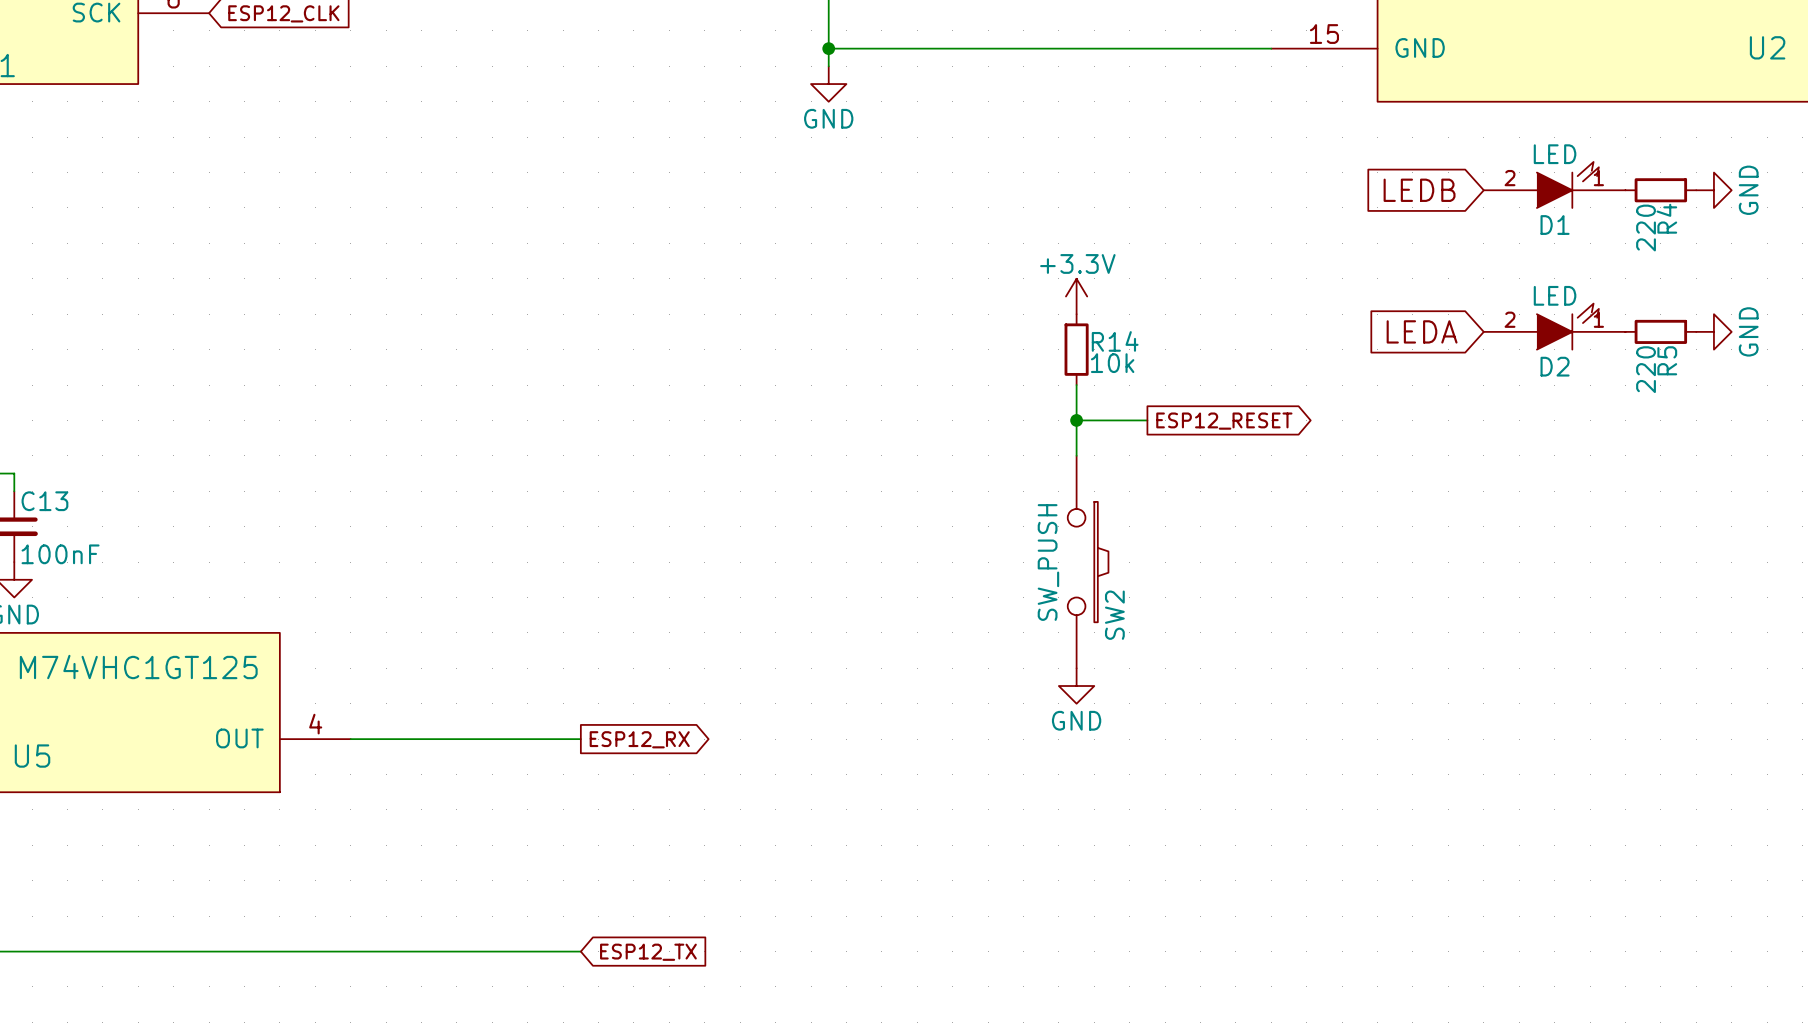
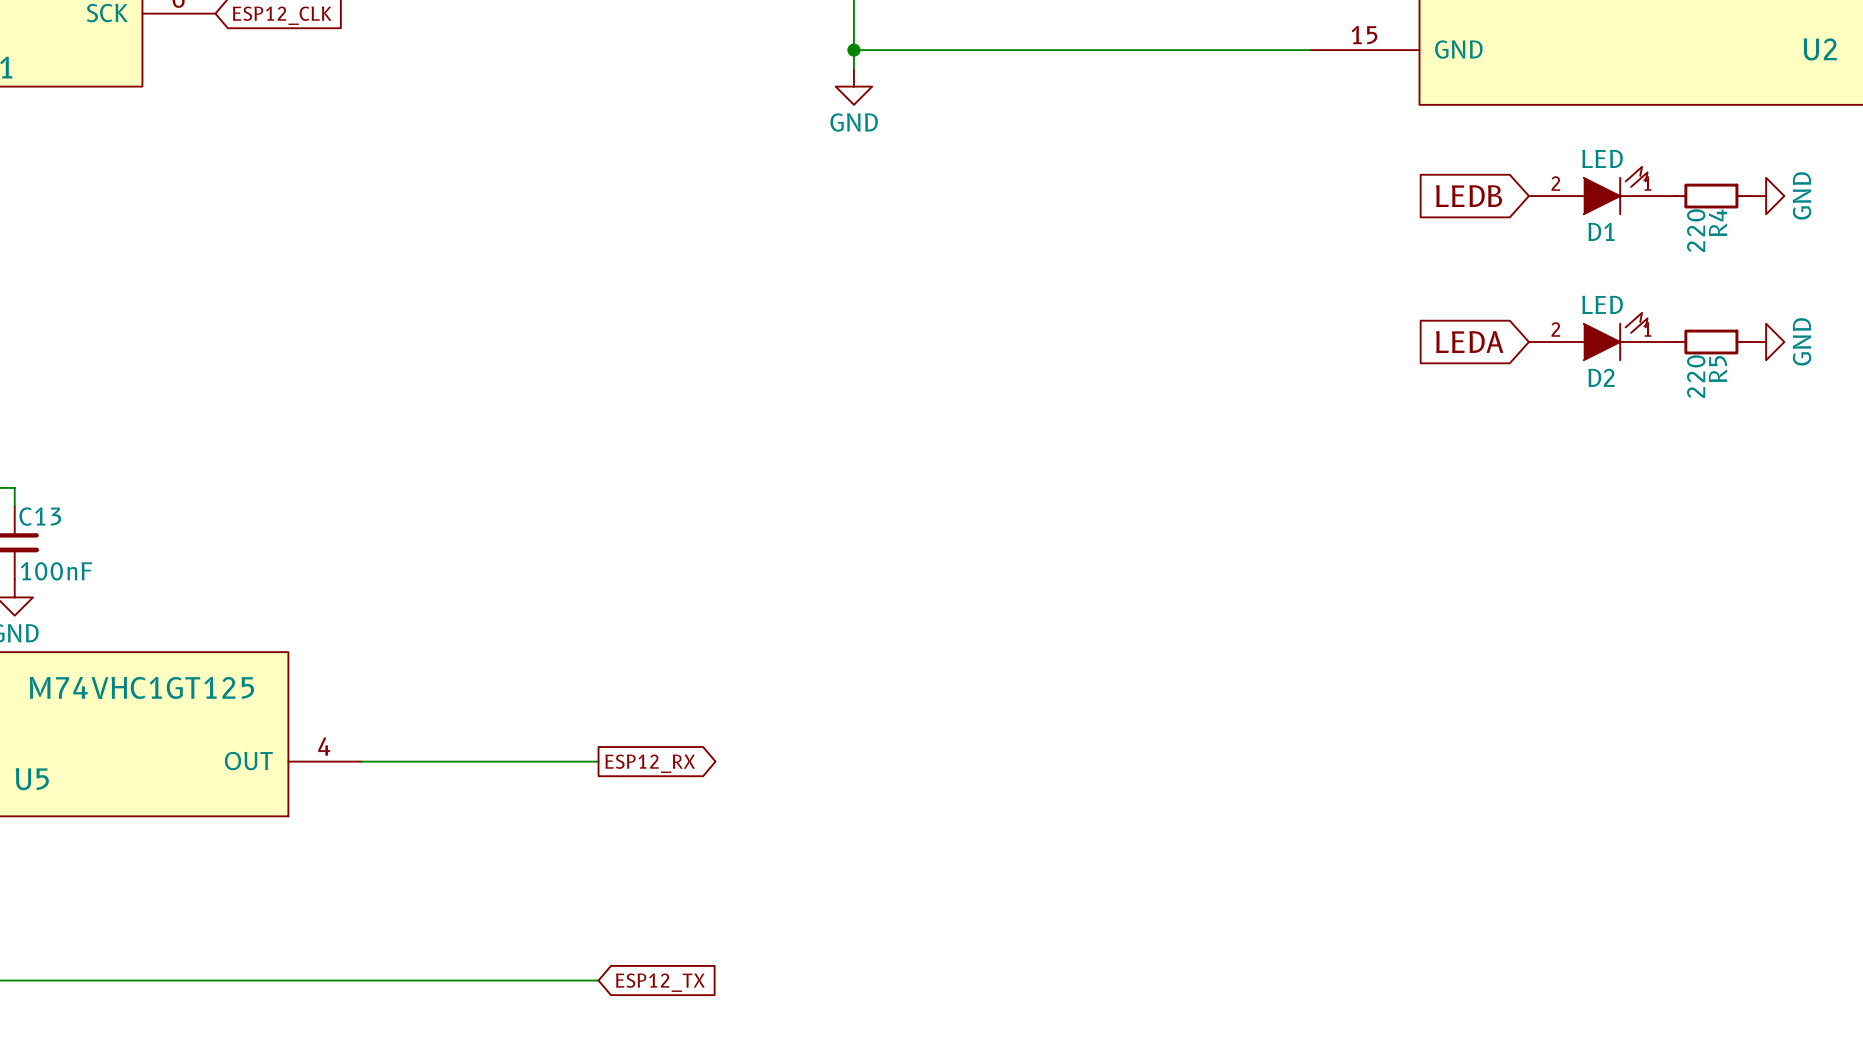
power symbol: +3.3V (1076, 296) -> none
R14: 10k (1076, 349) -> none
wire: (1076, 385) (1076, 455) -> none
wire: (1076, 420) (1147, 420) -> none
junction: (1076, 420) -> none
global label: ESP12_RESET (1224, 421) -> none
SW2: SW_PUSH (1088, 562) -> none
power symbol: GND (1076, 686) -> none

